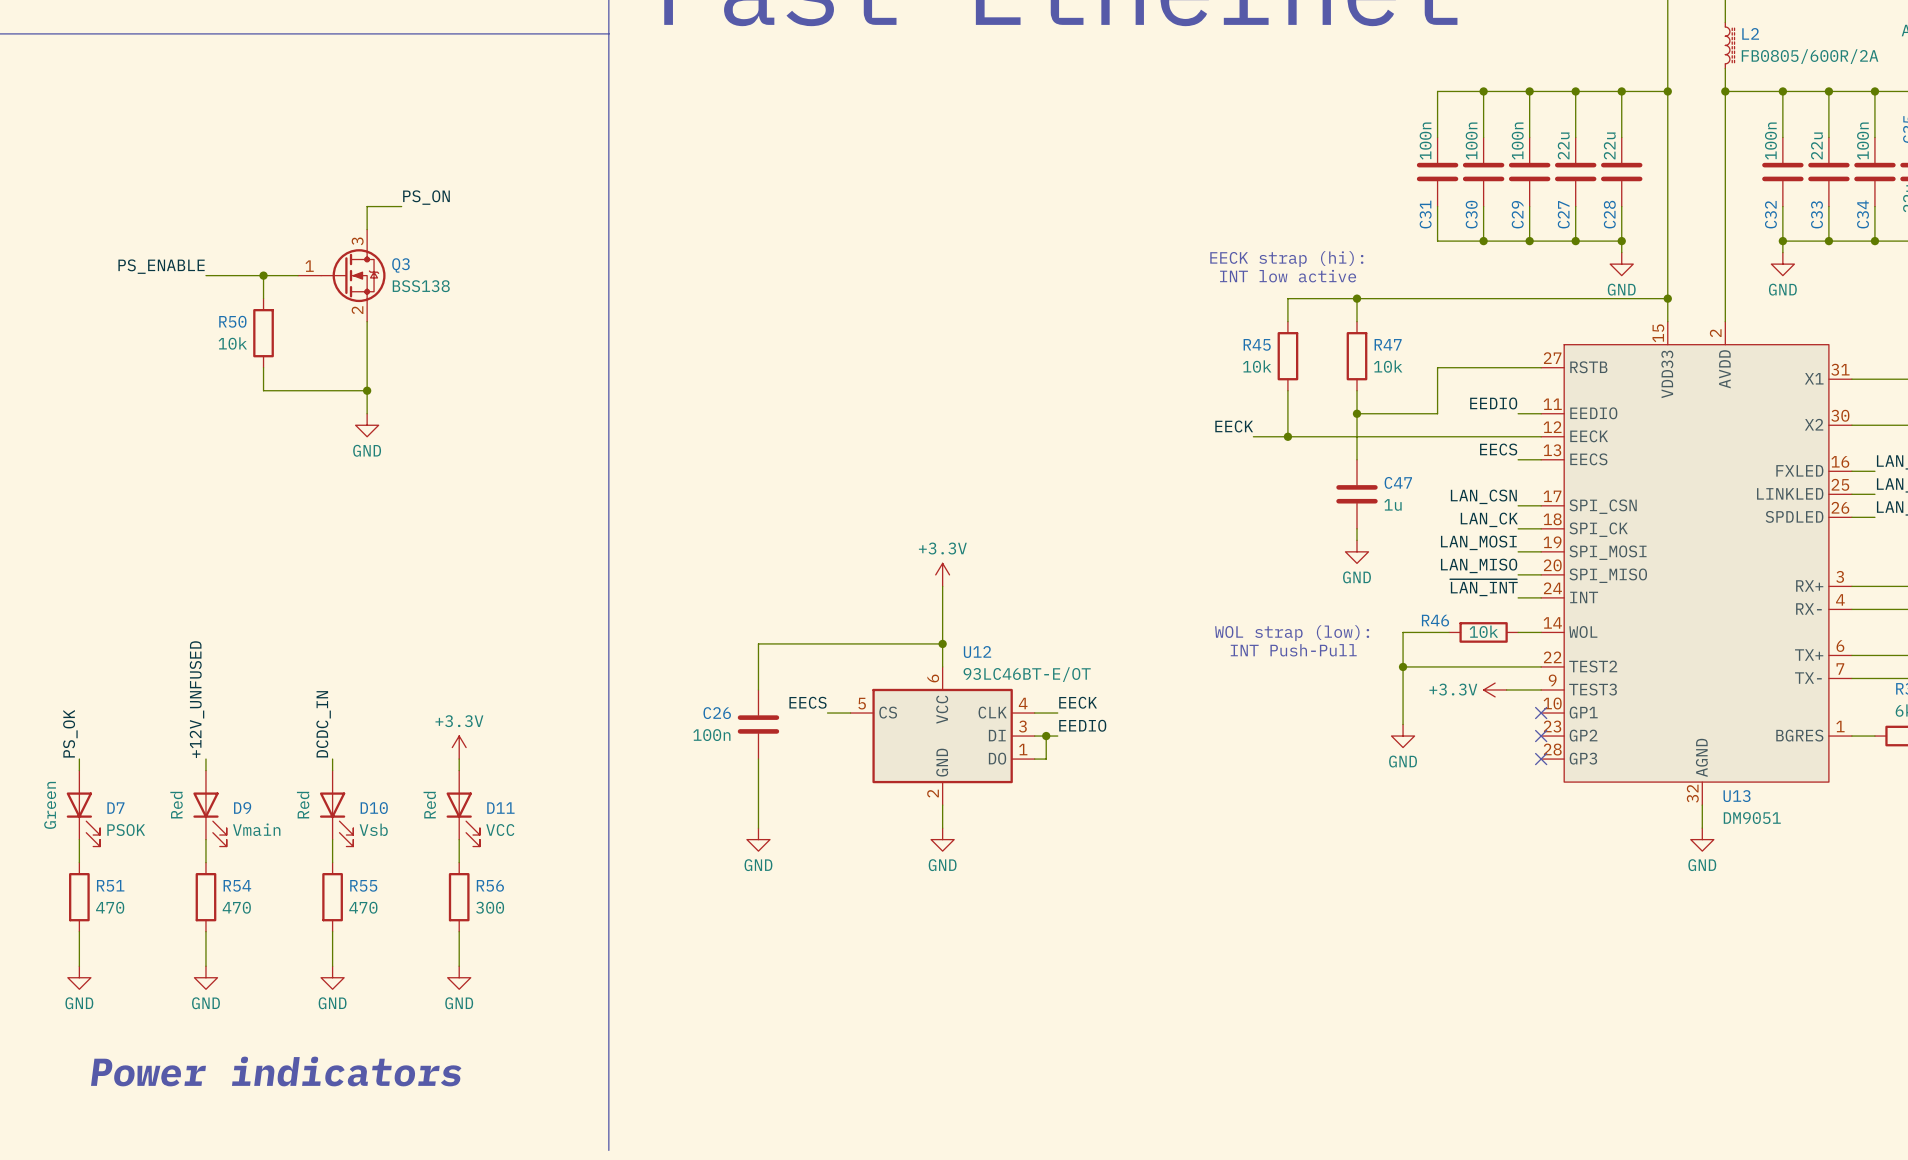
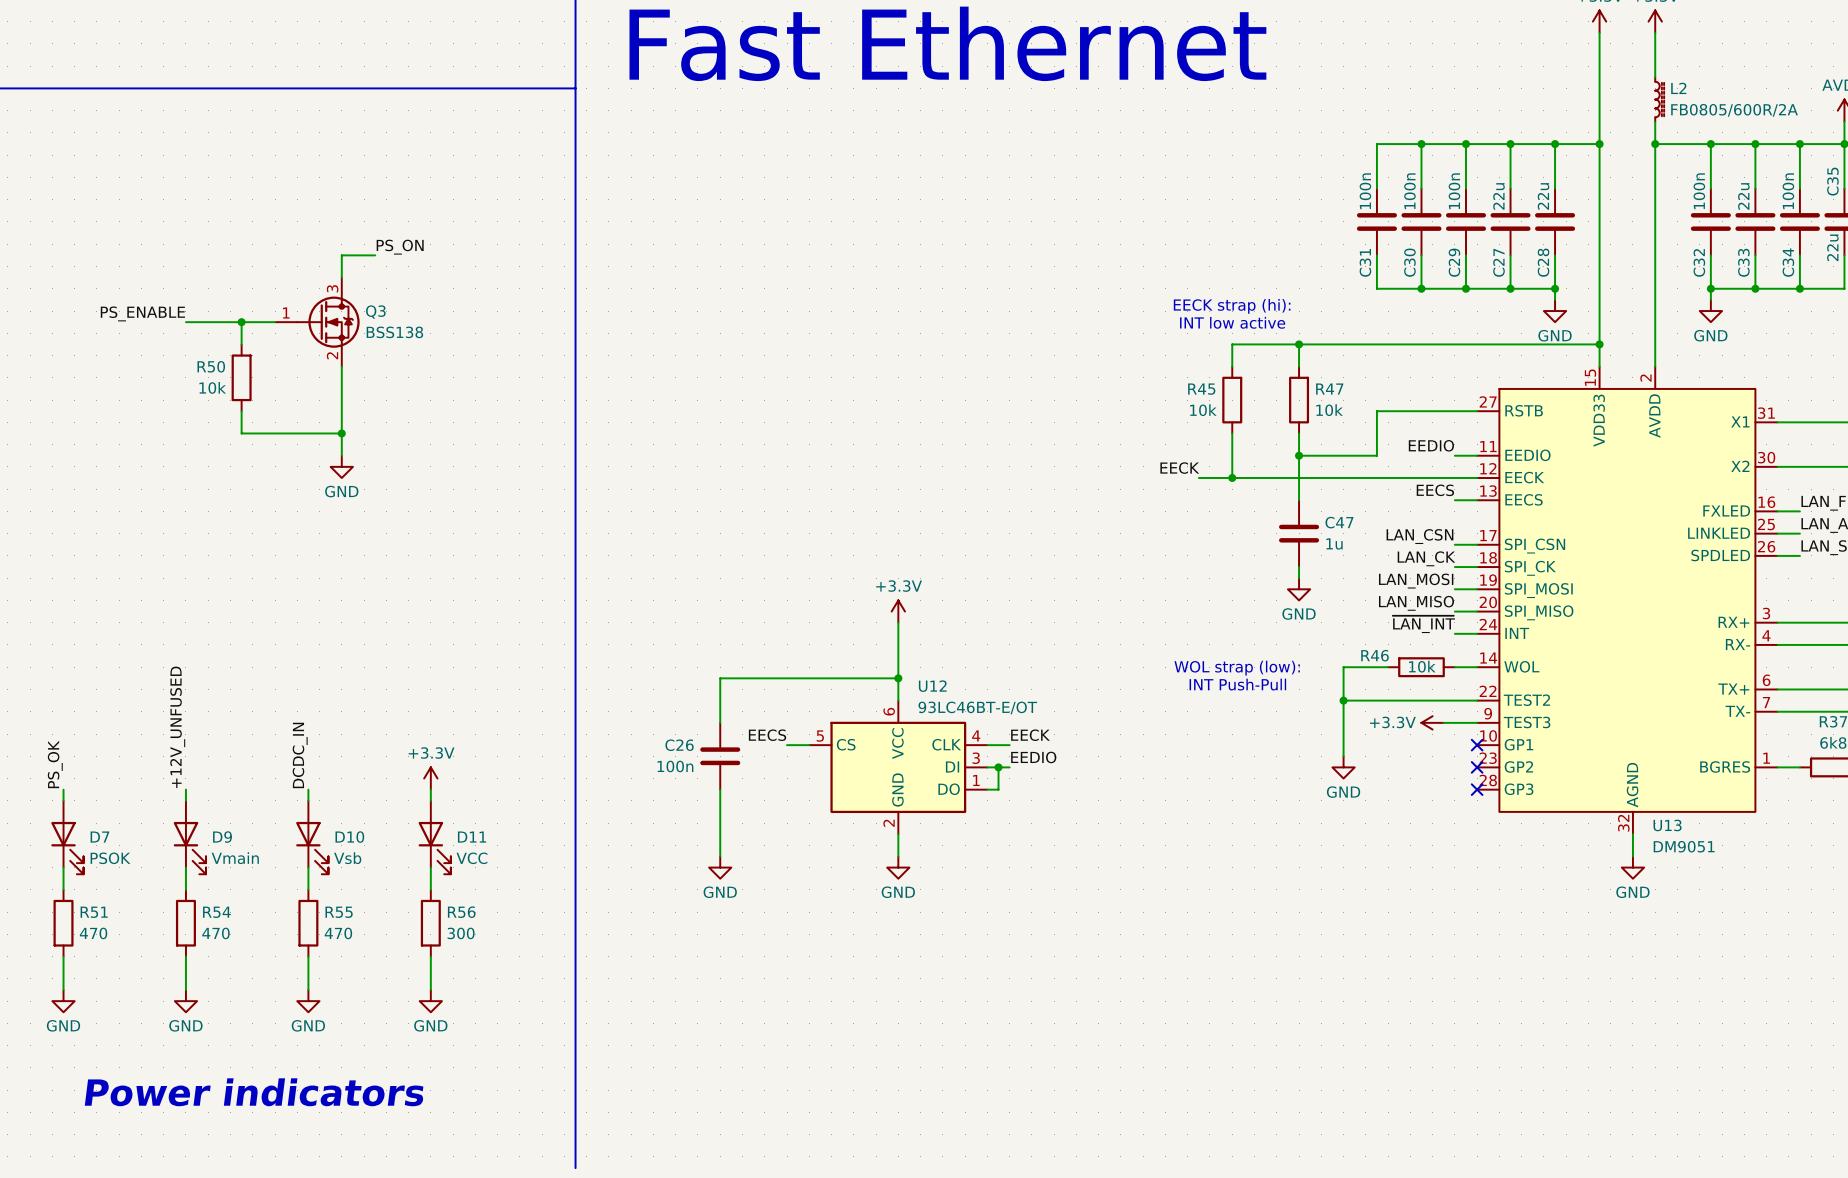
D7 text: Green (50, 805) -> none
D9 text: Red (176, 805) -> none
D10 text: Red (303, 805) -> none
D11 text: Red (429, 805) -> none

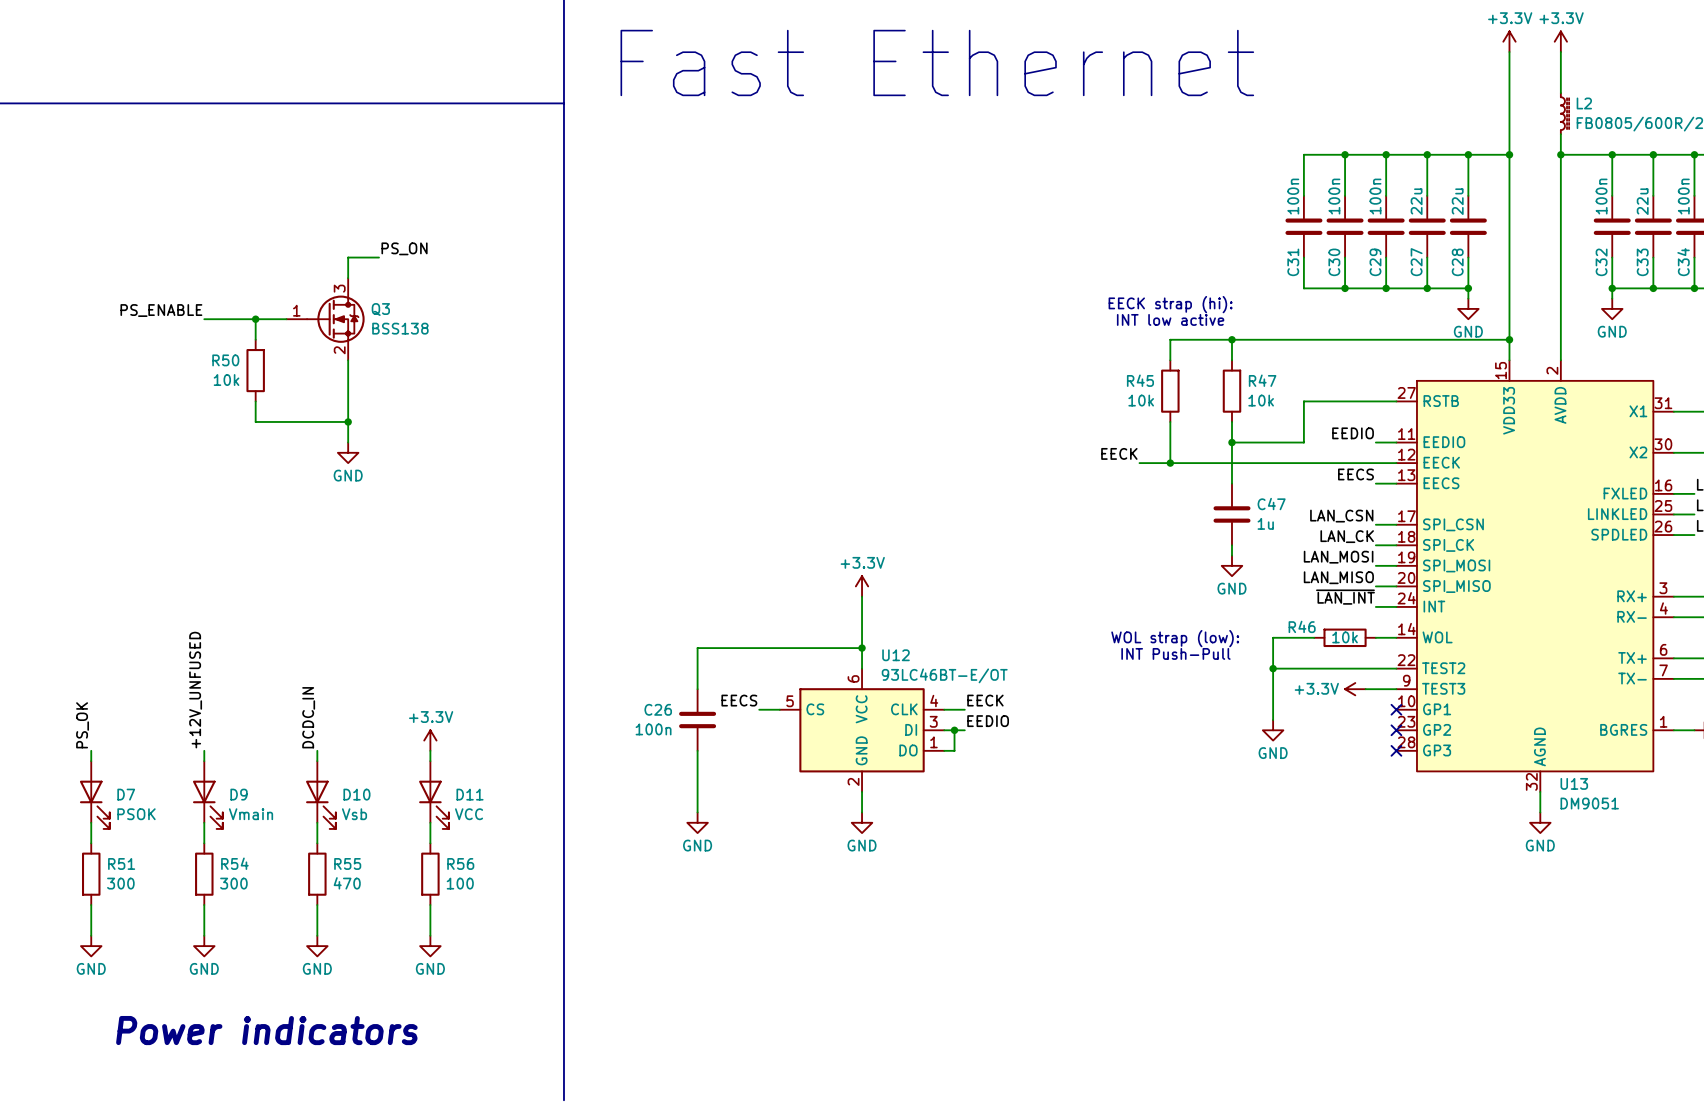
R51 value: 470 (93, 933) -> 300 (120, 883)
R54 value: 470 (215, 933) -> 300 (233, 883)
R56 value: 300 (461, 933) -> 100 (460, 883)

